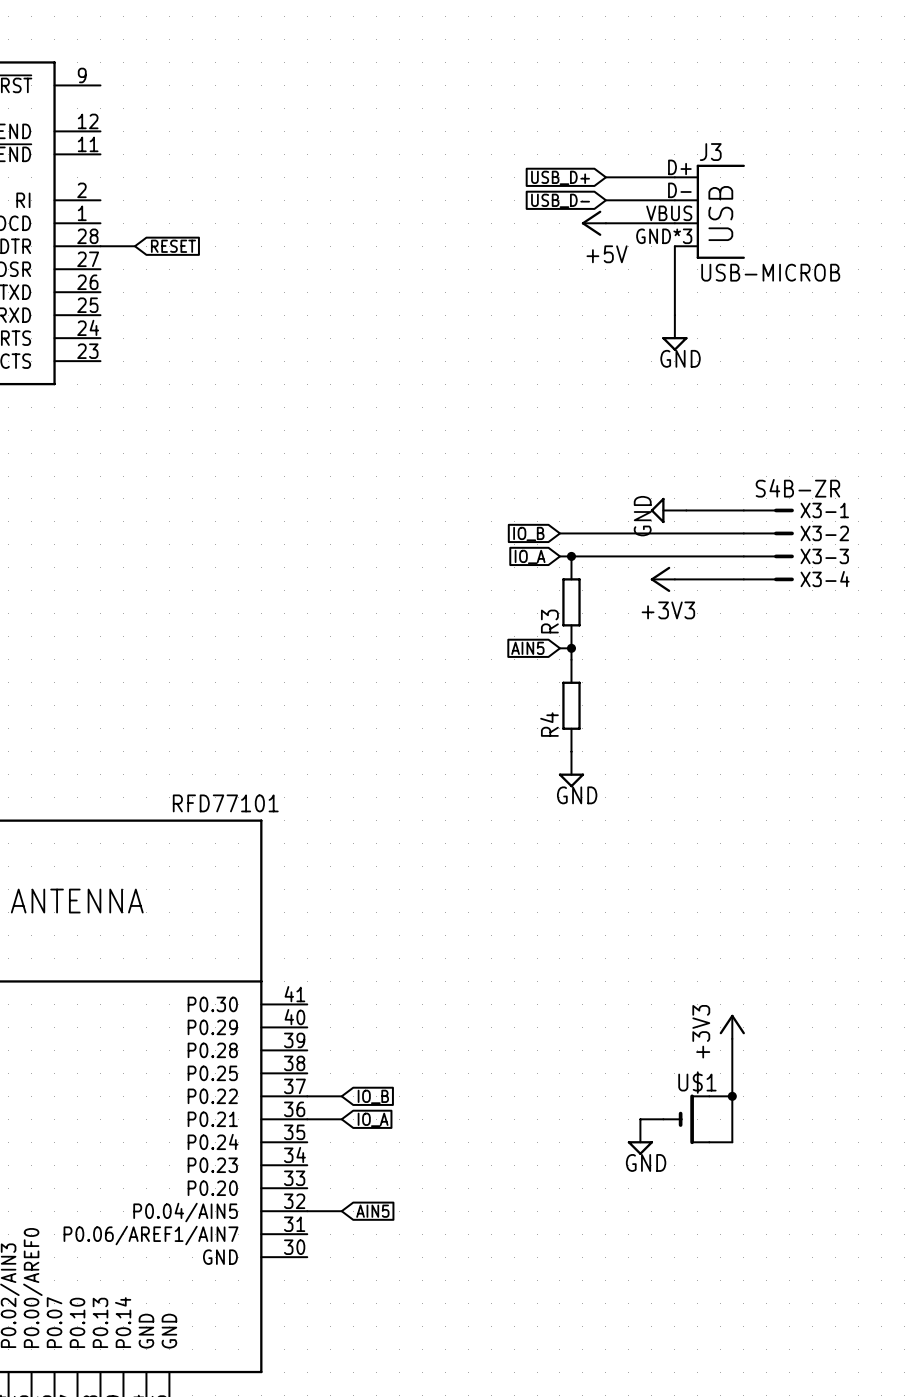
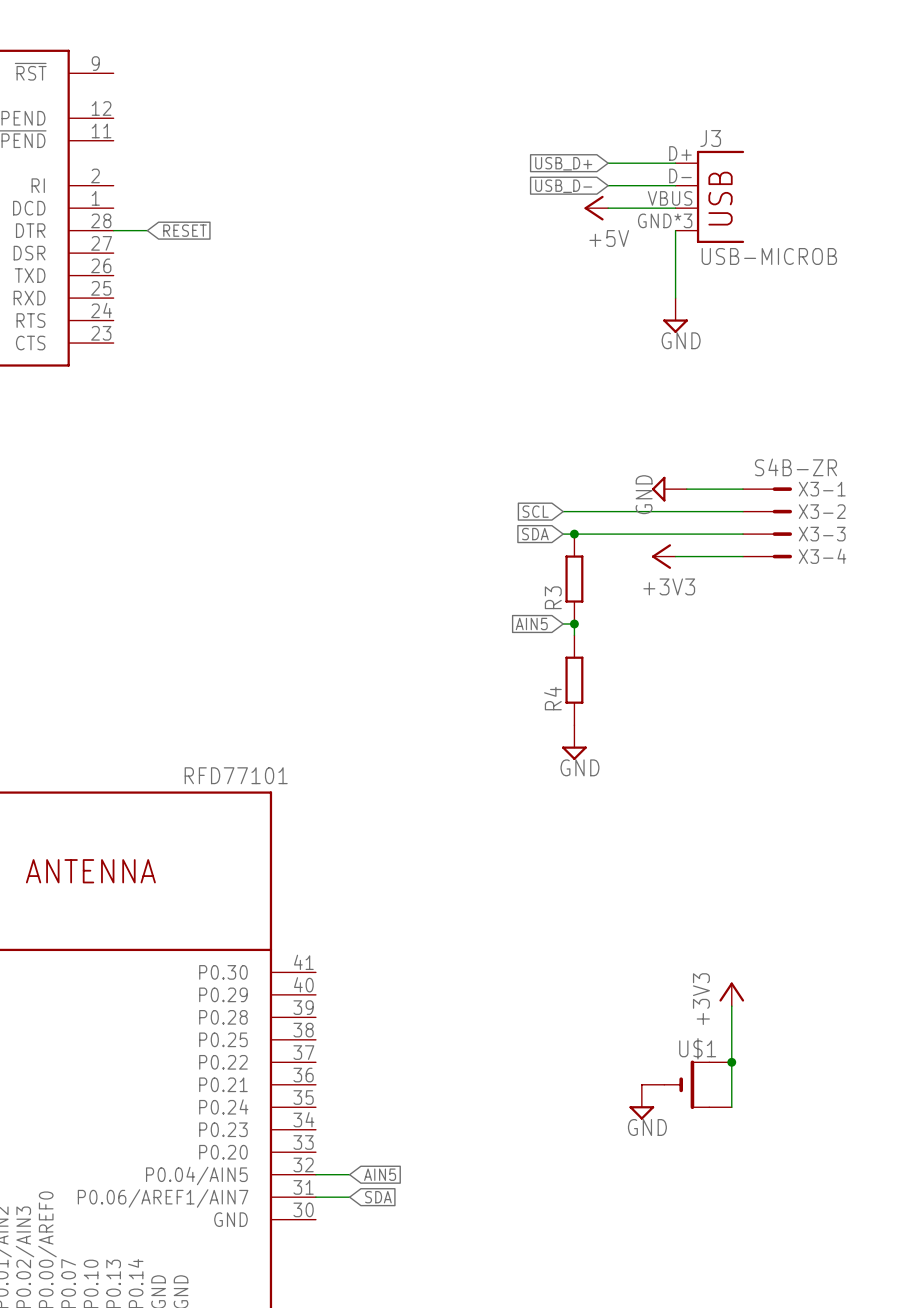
global label: IO_B (528, 533) -> SCL (535, 511)
global label: IO_A (530, 556) -> SDA (535, 534)
wire: (307, 1096) (341, 1096) -> none
global label: IO_B (373, 1096) -> none
wire: (307, 1119) (341, 1119) -> (315, 1197) (349, 1197)
global label: IO_A (373, 1119) -> none
global label: none -> SDA (378, 1197)

